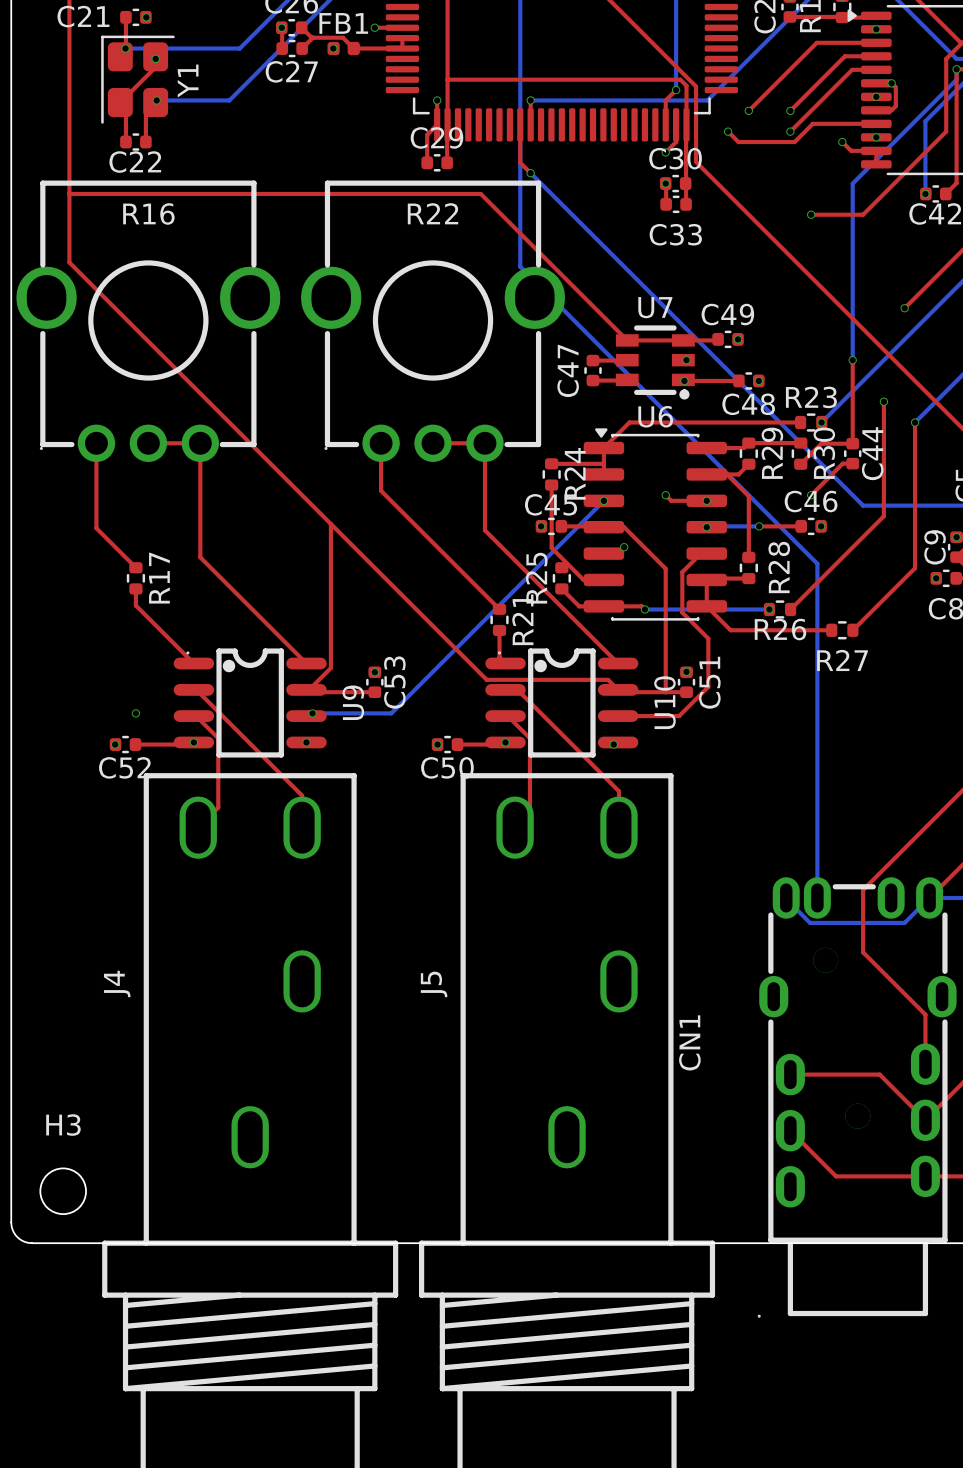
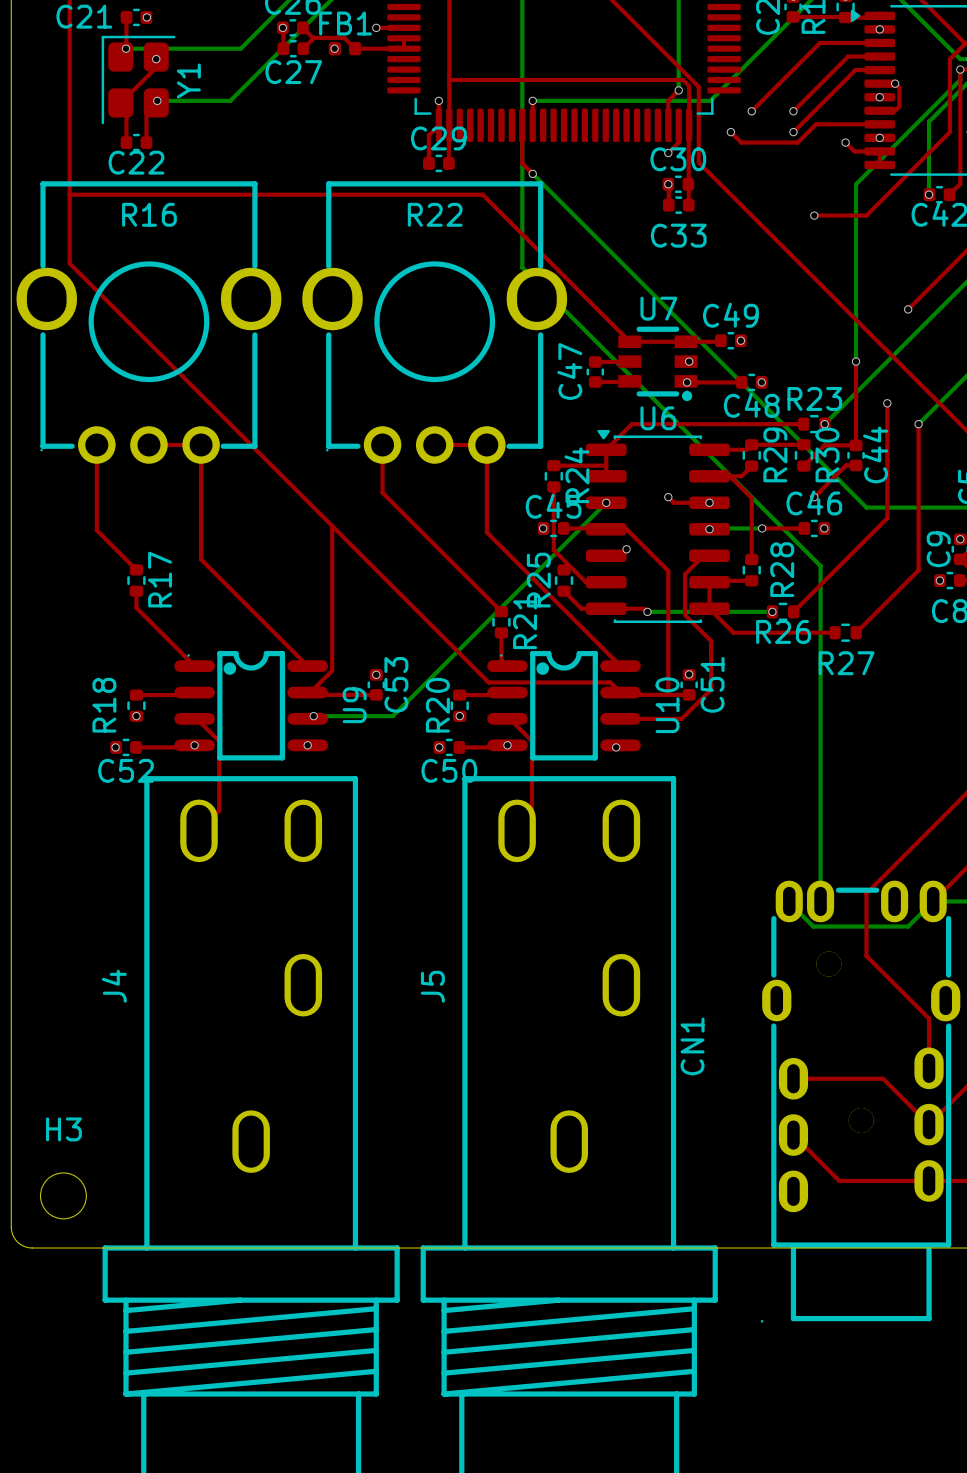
top track: (193, 689) (196, 689) (302, 795) (302, 827) -> none
top track: (505, 689) (517, 689) (618, 791) (618, 827) -> none
top track: none -> (136, 695) (192, 695)
top track: none -> (459, 695) (504, 695)
R18: none -> (136, 705)
R20: none -> (459, 705)
via: none -> (459, 716)

